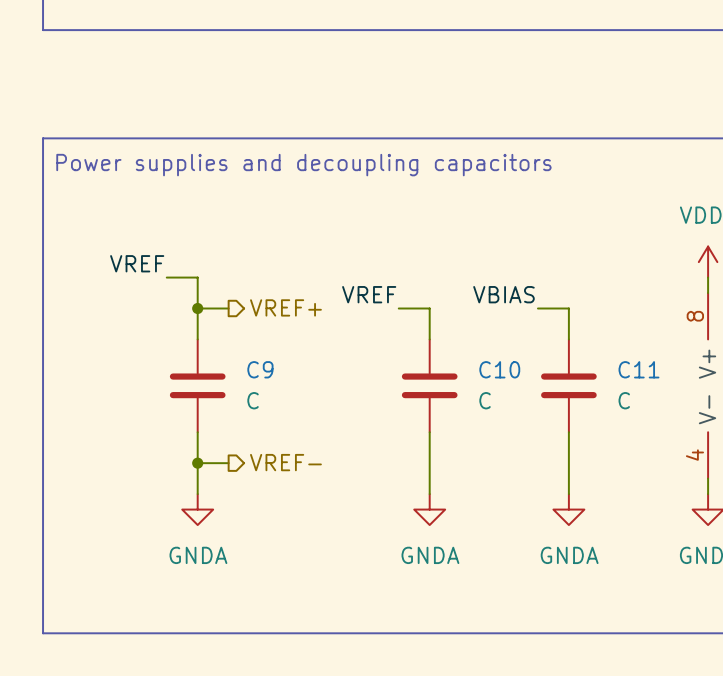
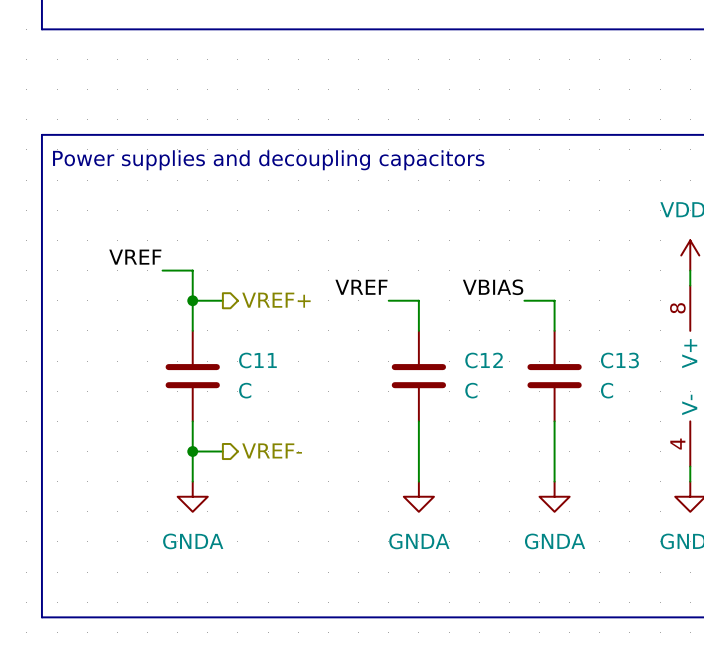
C9 name: C9 (260, 369) -> C11 (257, 360)
C10 name: C10 (499, 369) -> C12 (484, 360)
C11 name: C11 (638, 369) -> C13 (619, 360)

